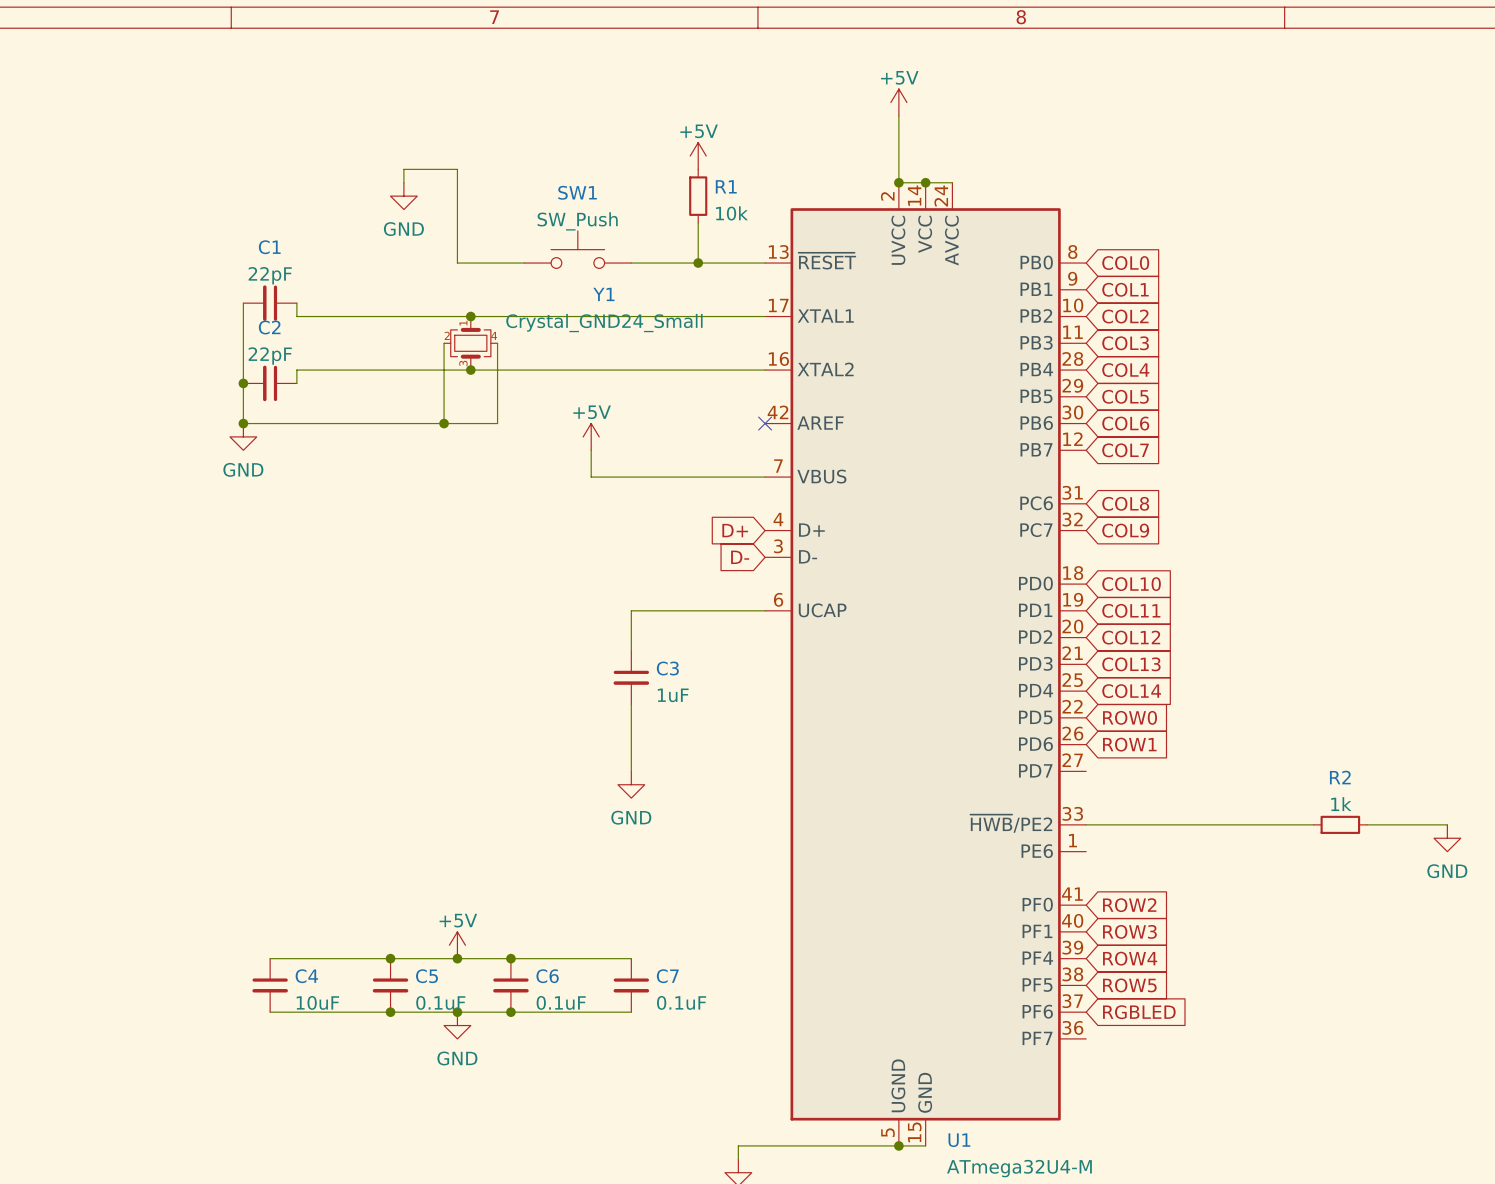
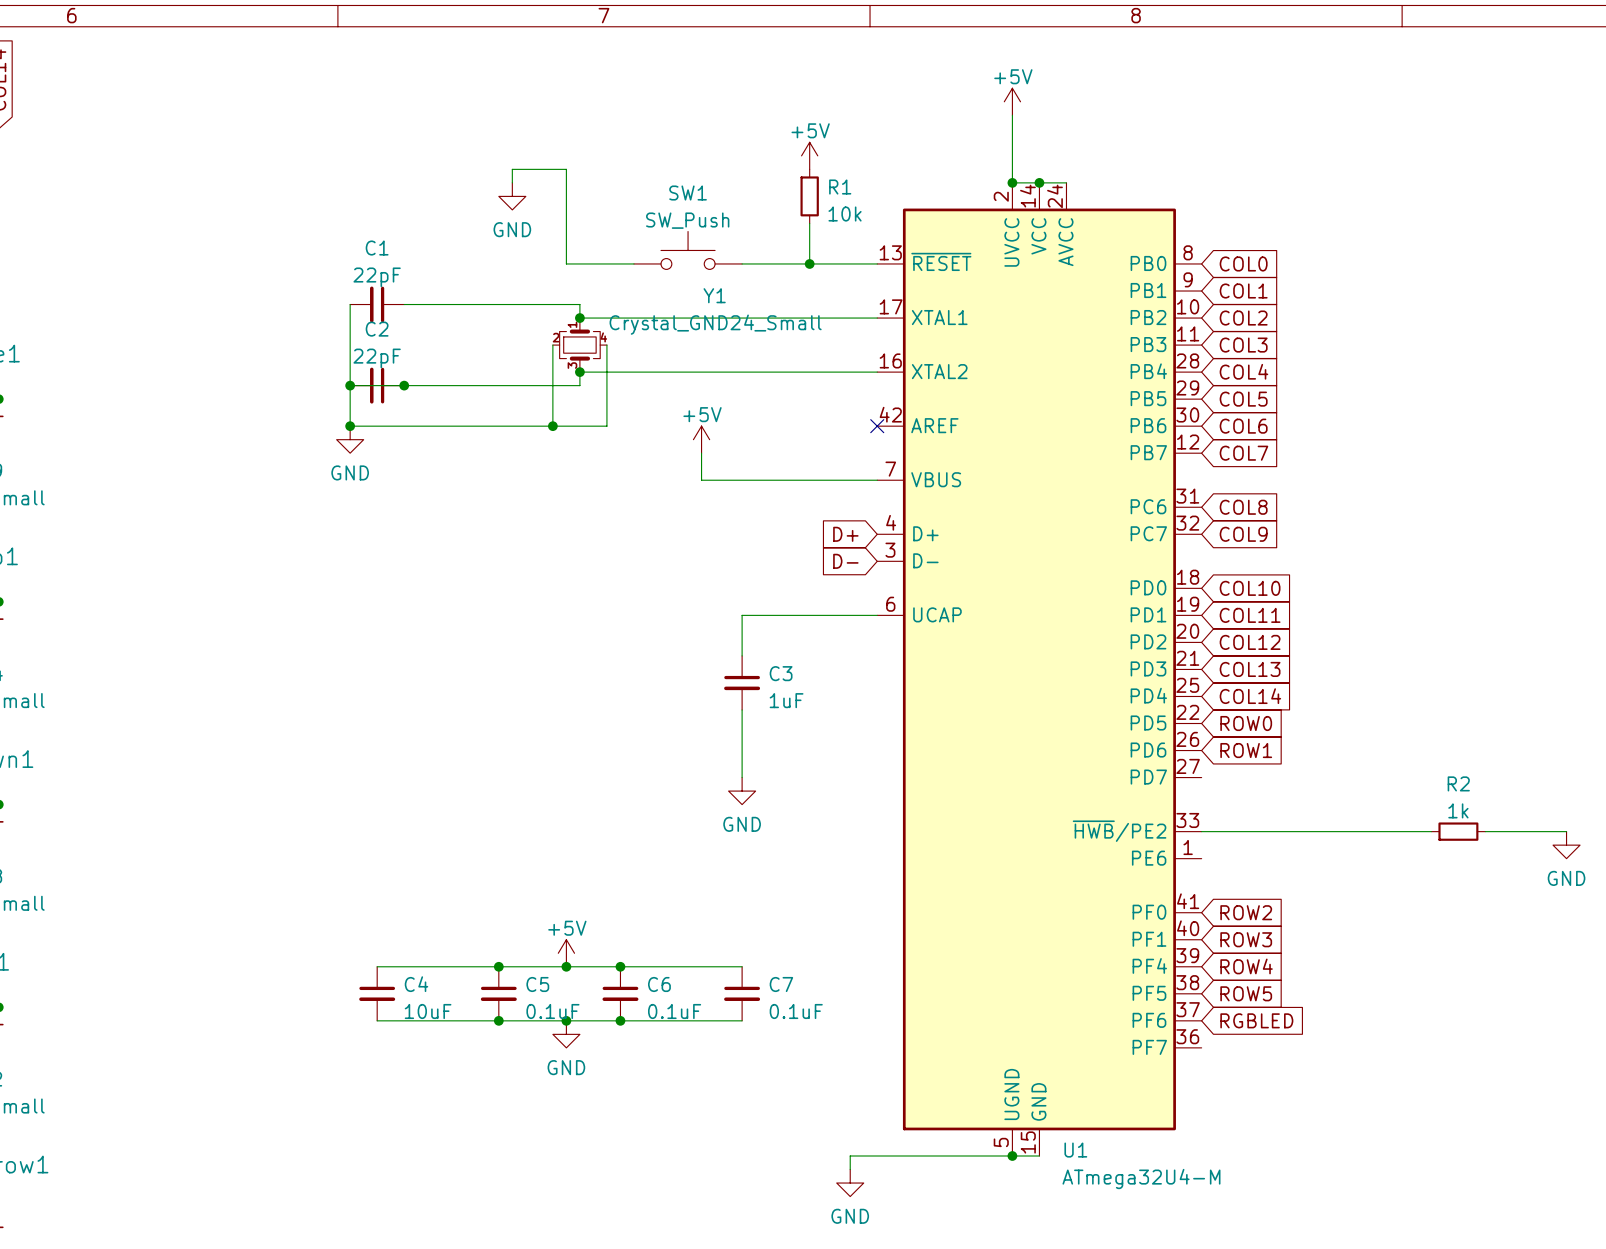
wire: (296, 303) (296, 316) (470, 316) -> (404, 304) (579, 304) (579, 318)
wire: (470, 370) (296, 370) (296, 383) -> (579, 372) (579, 385) (350, 385)
junction: none -> (404, 385)

